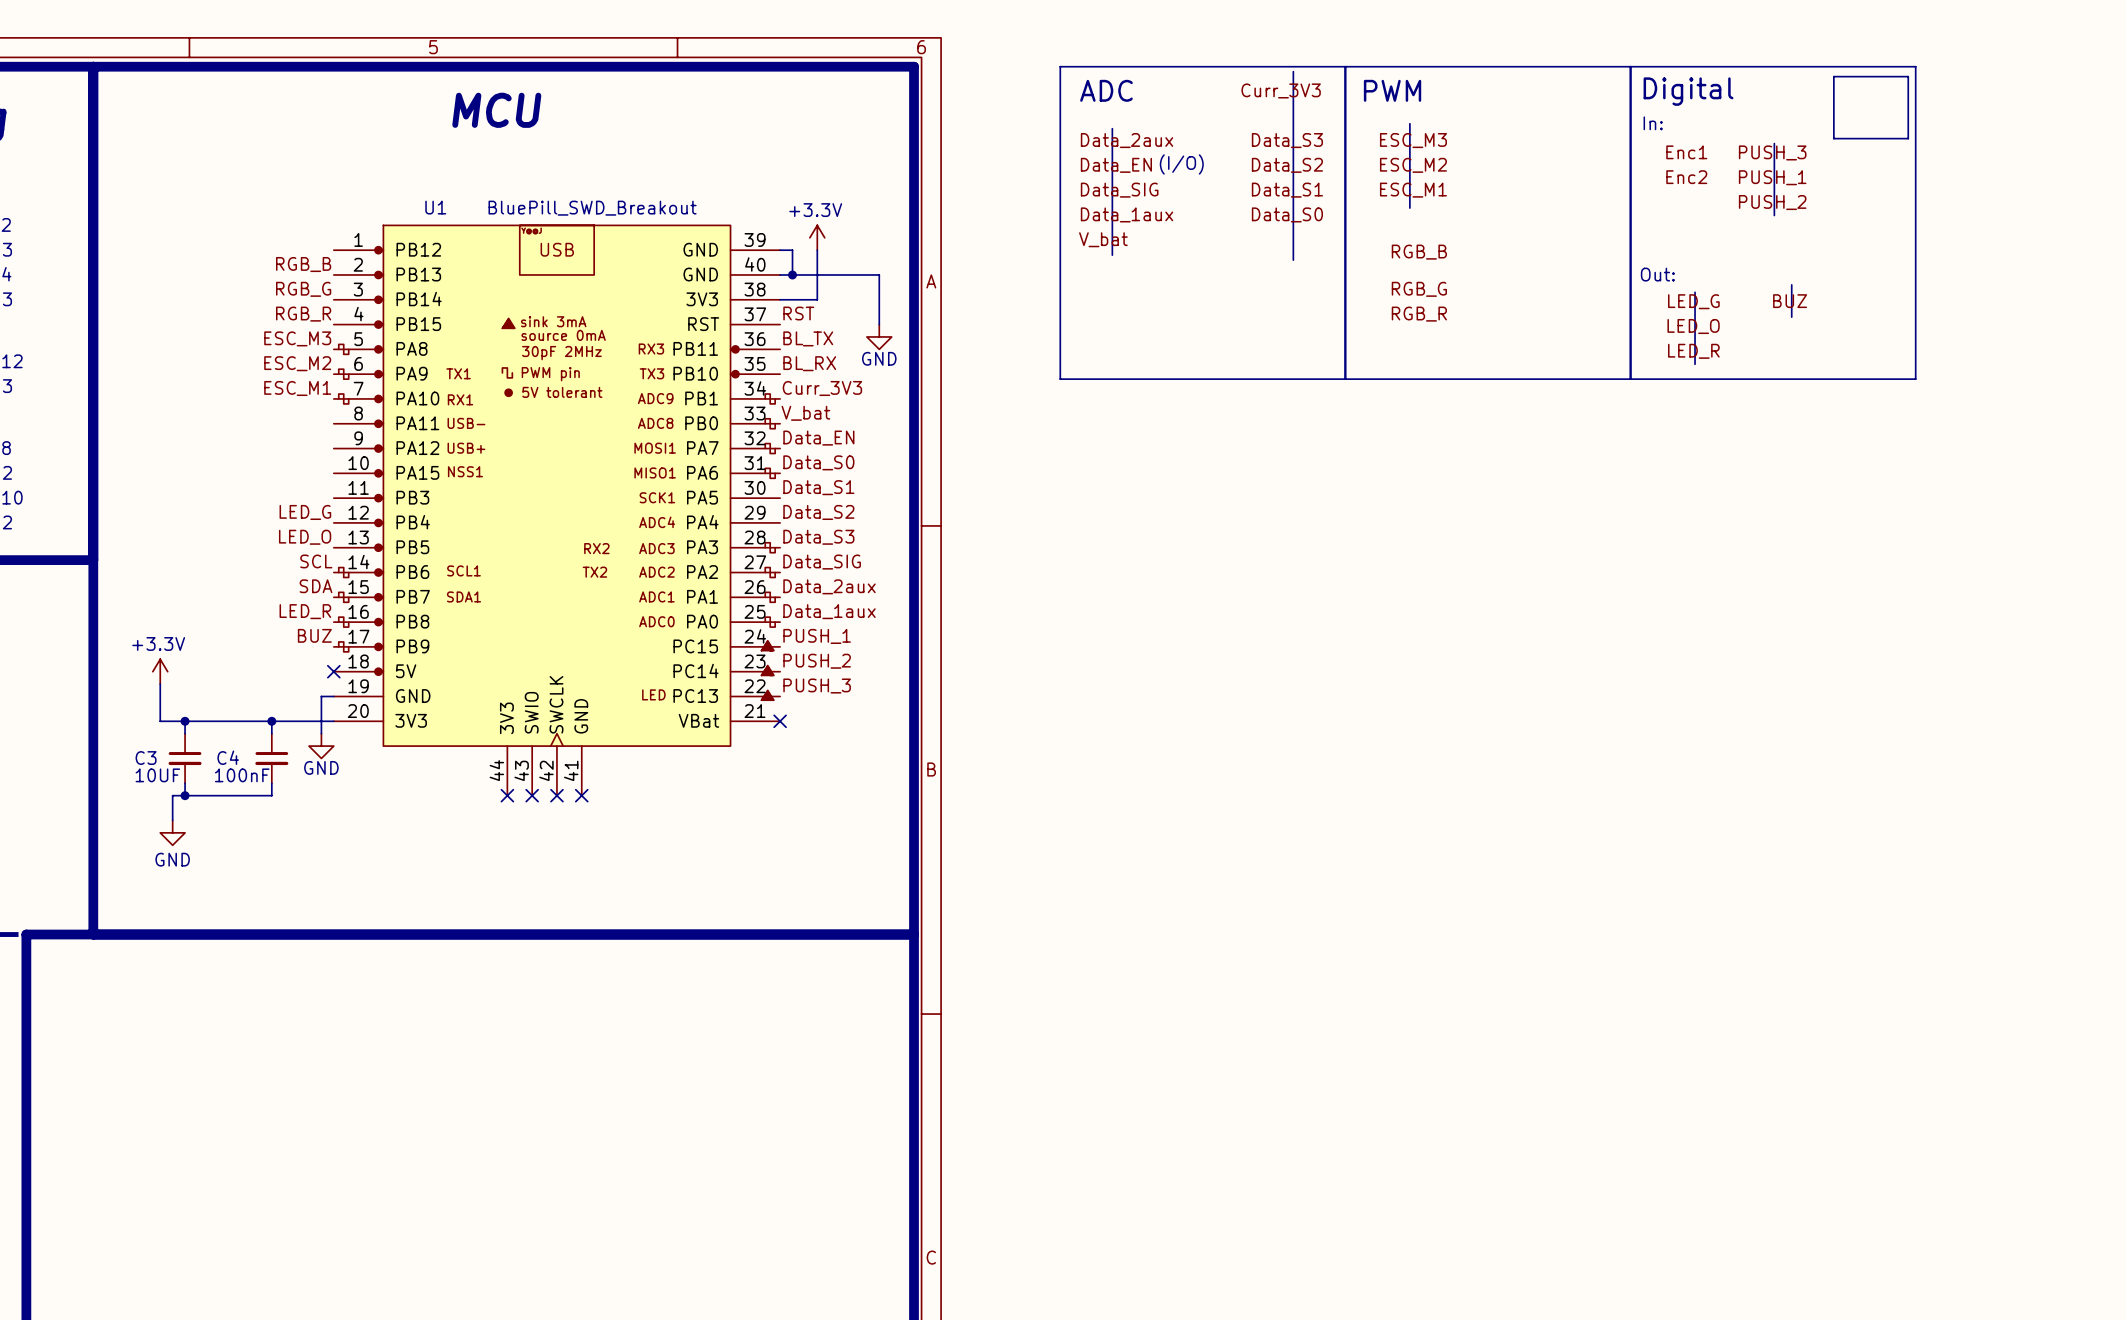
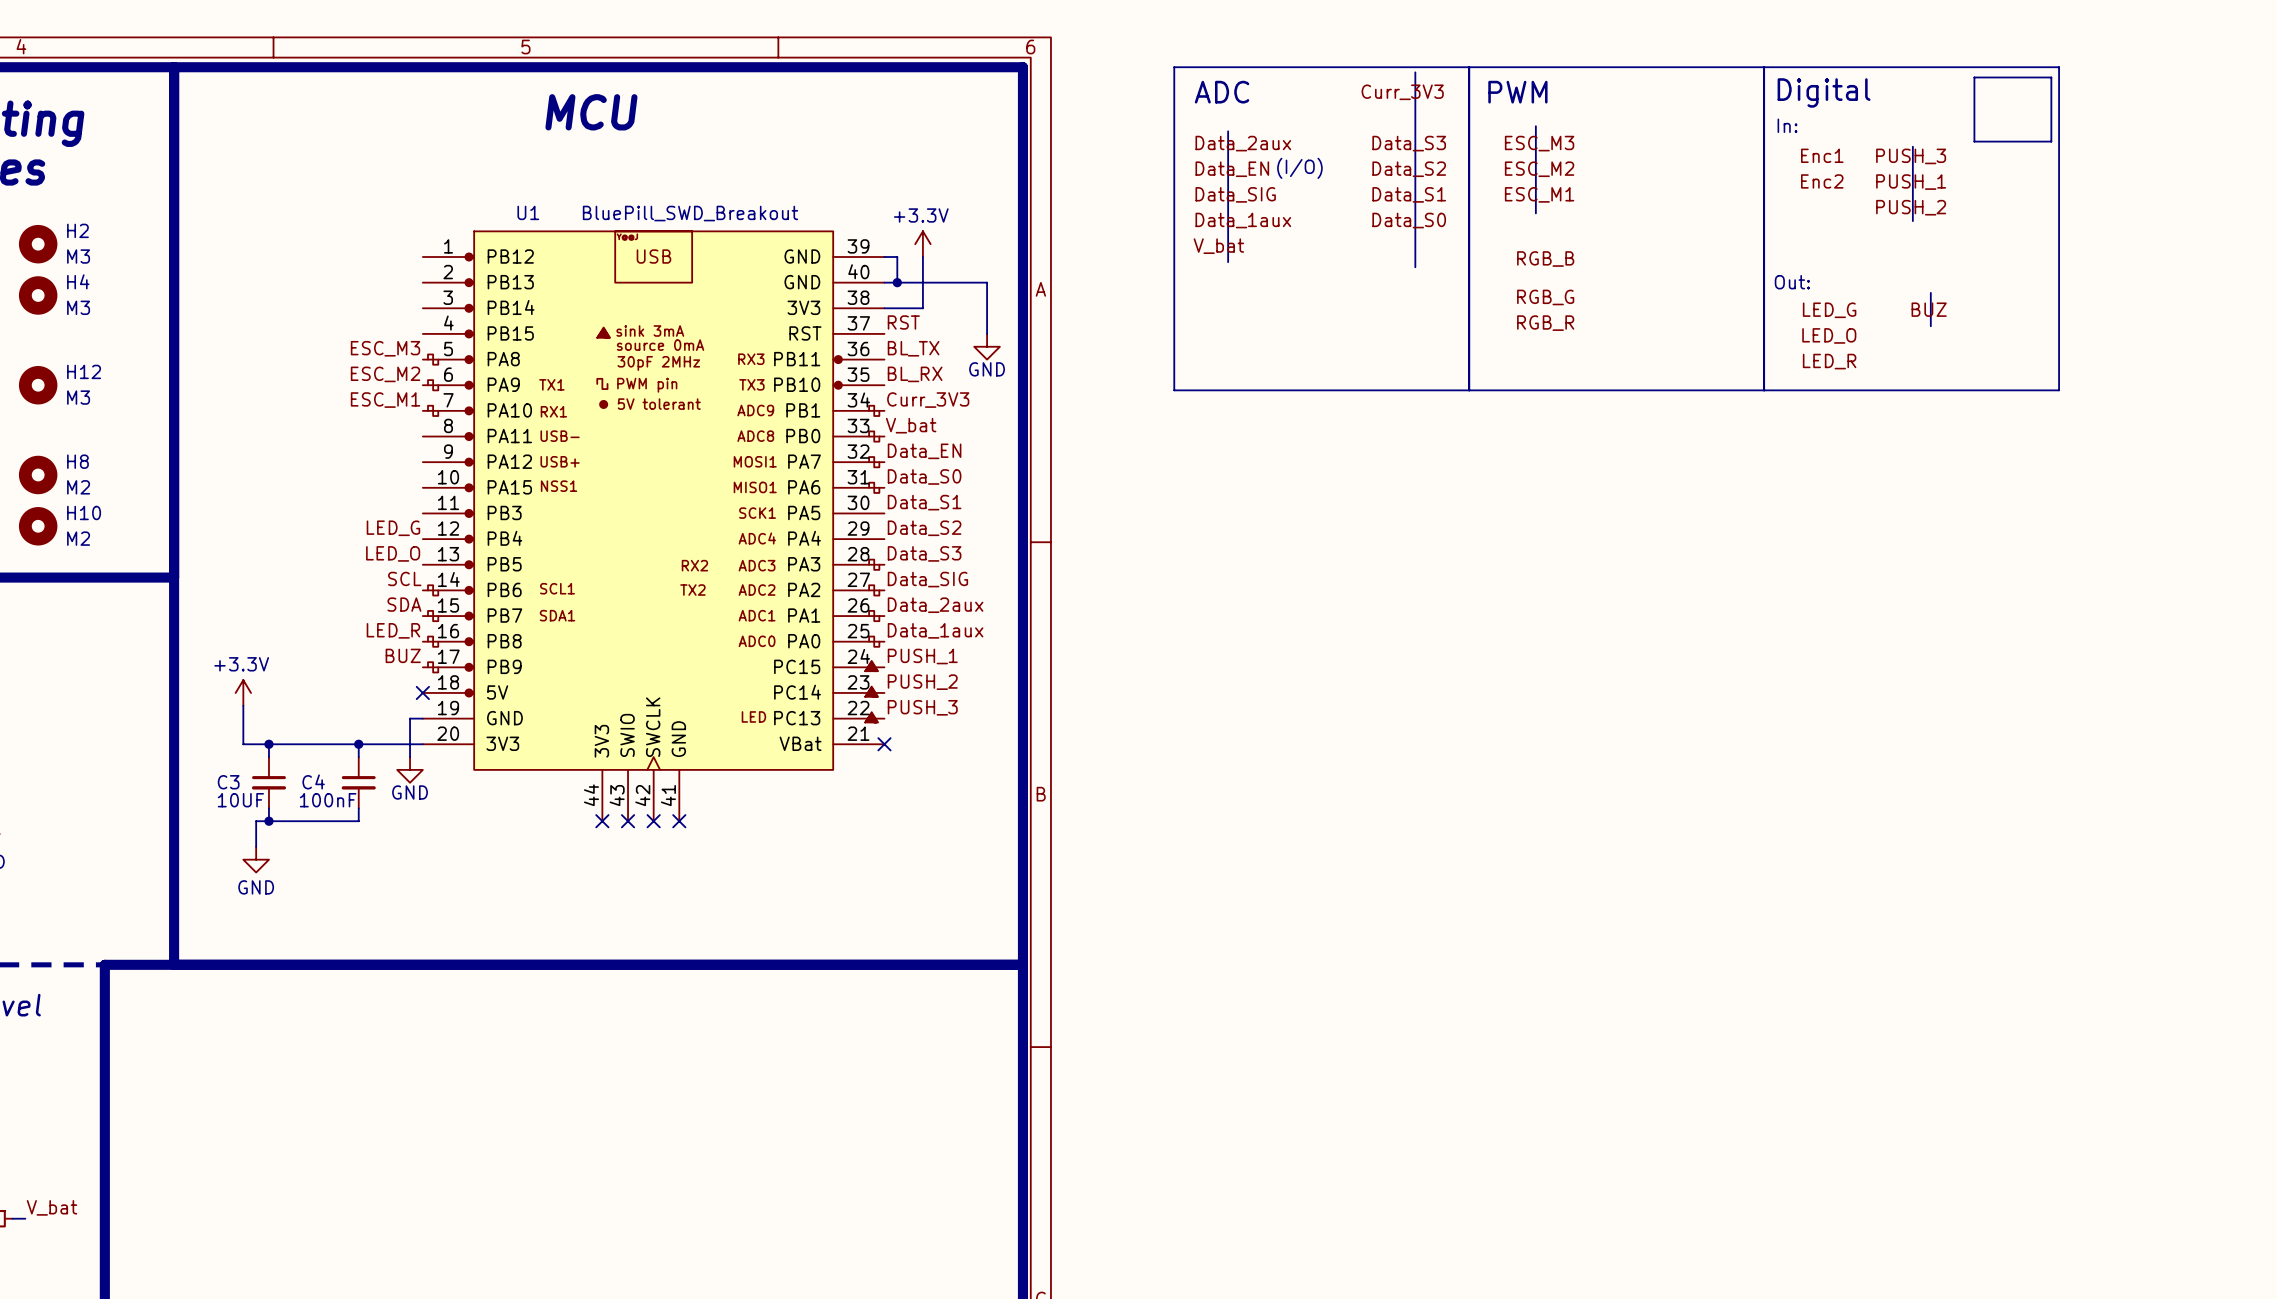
label: RGB_B (303, 264) -> none
label: RGB_G (303, 289) -> none
line: (1695, 292) (1695, 364) -> none
label: RGB_R (303, 314) -> none

